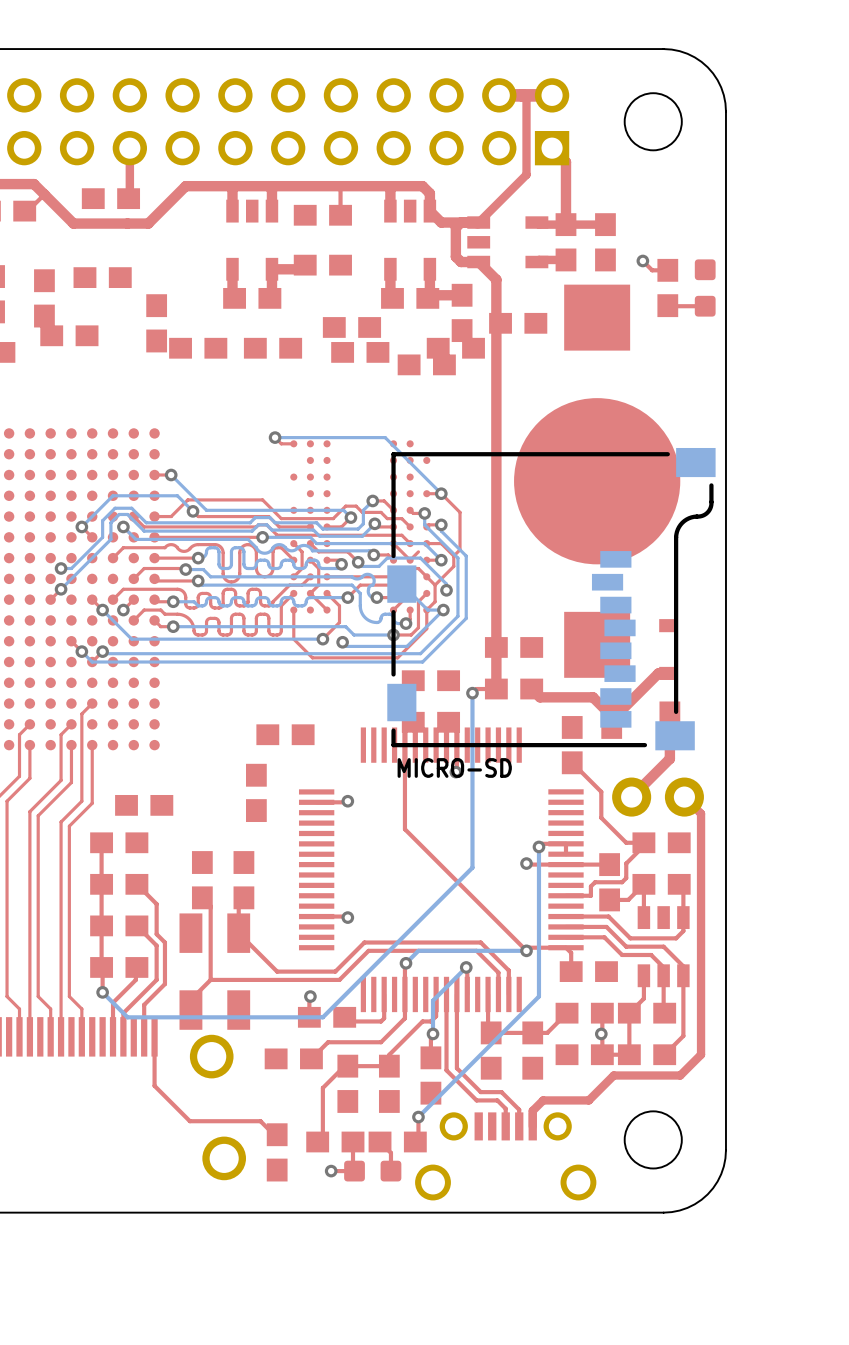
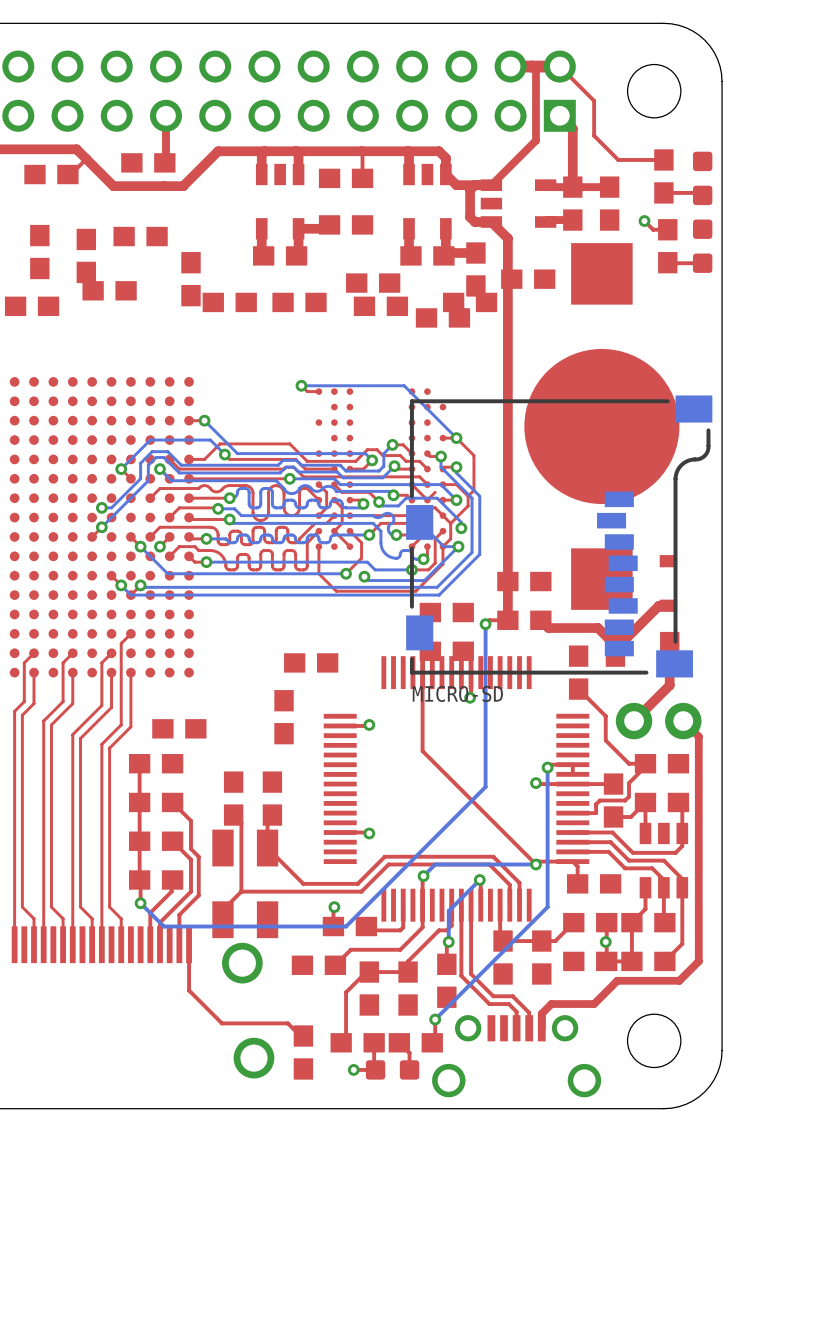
top track: none -> (559, 66) (594, 100) (594, 135) (618, 159) (663, 159)
part: none -> (663, 176)
part: none -> (702, 178)
top track: none -> (663, 192) (700, 192) (702, 195)

